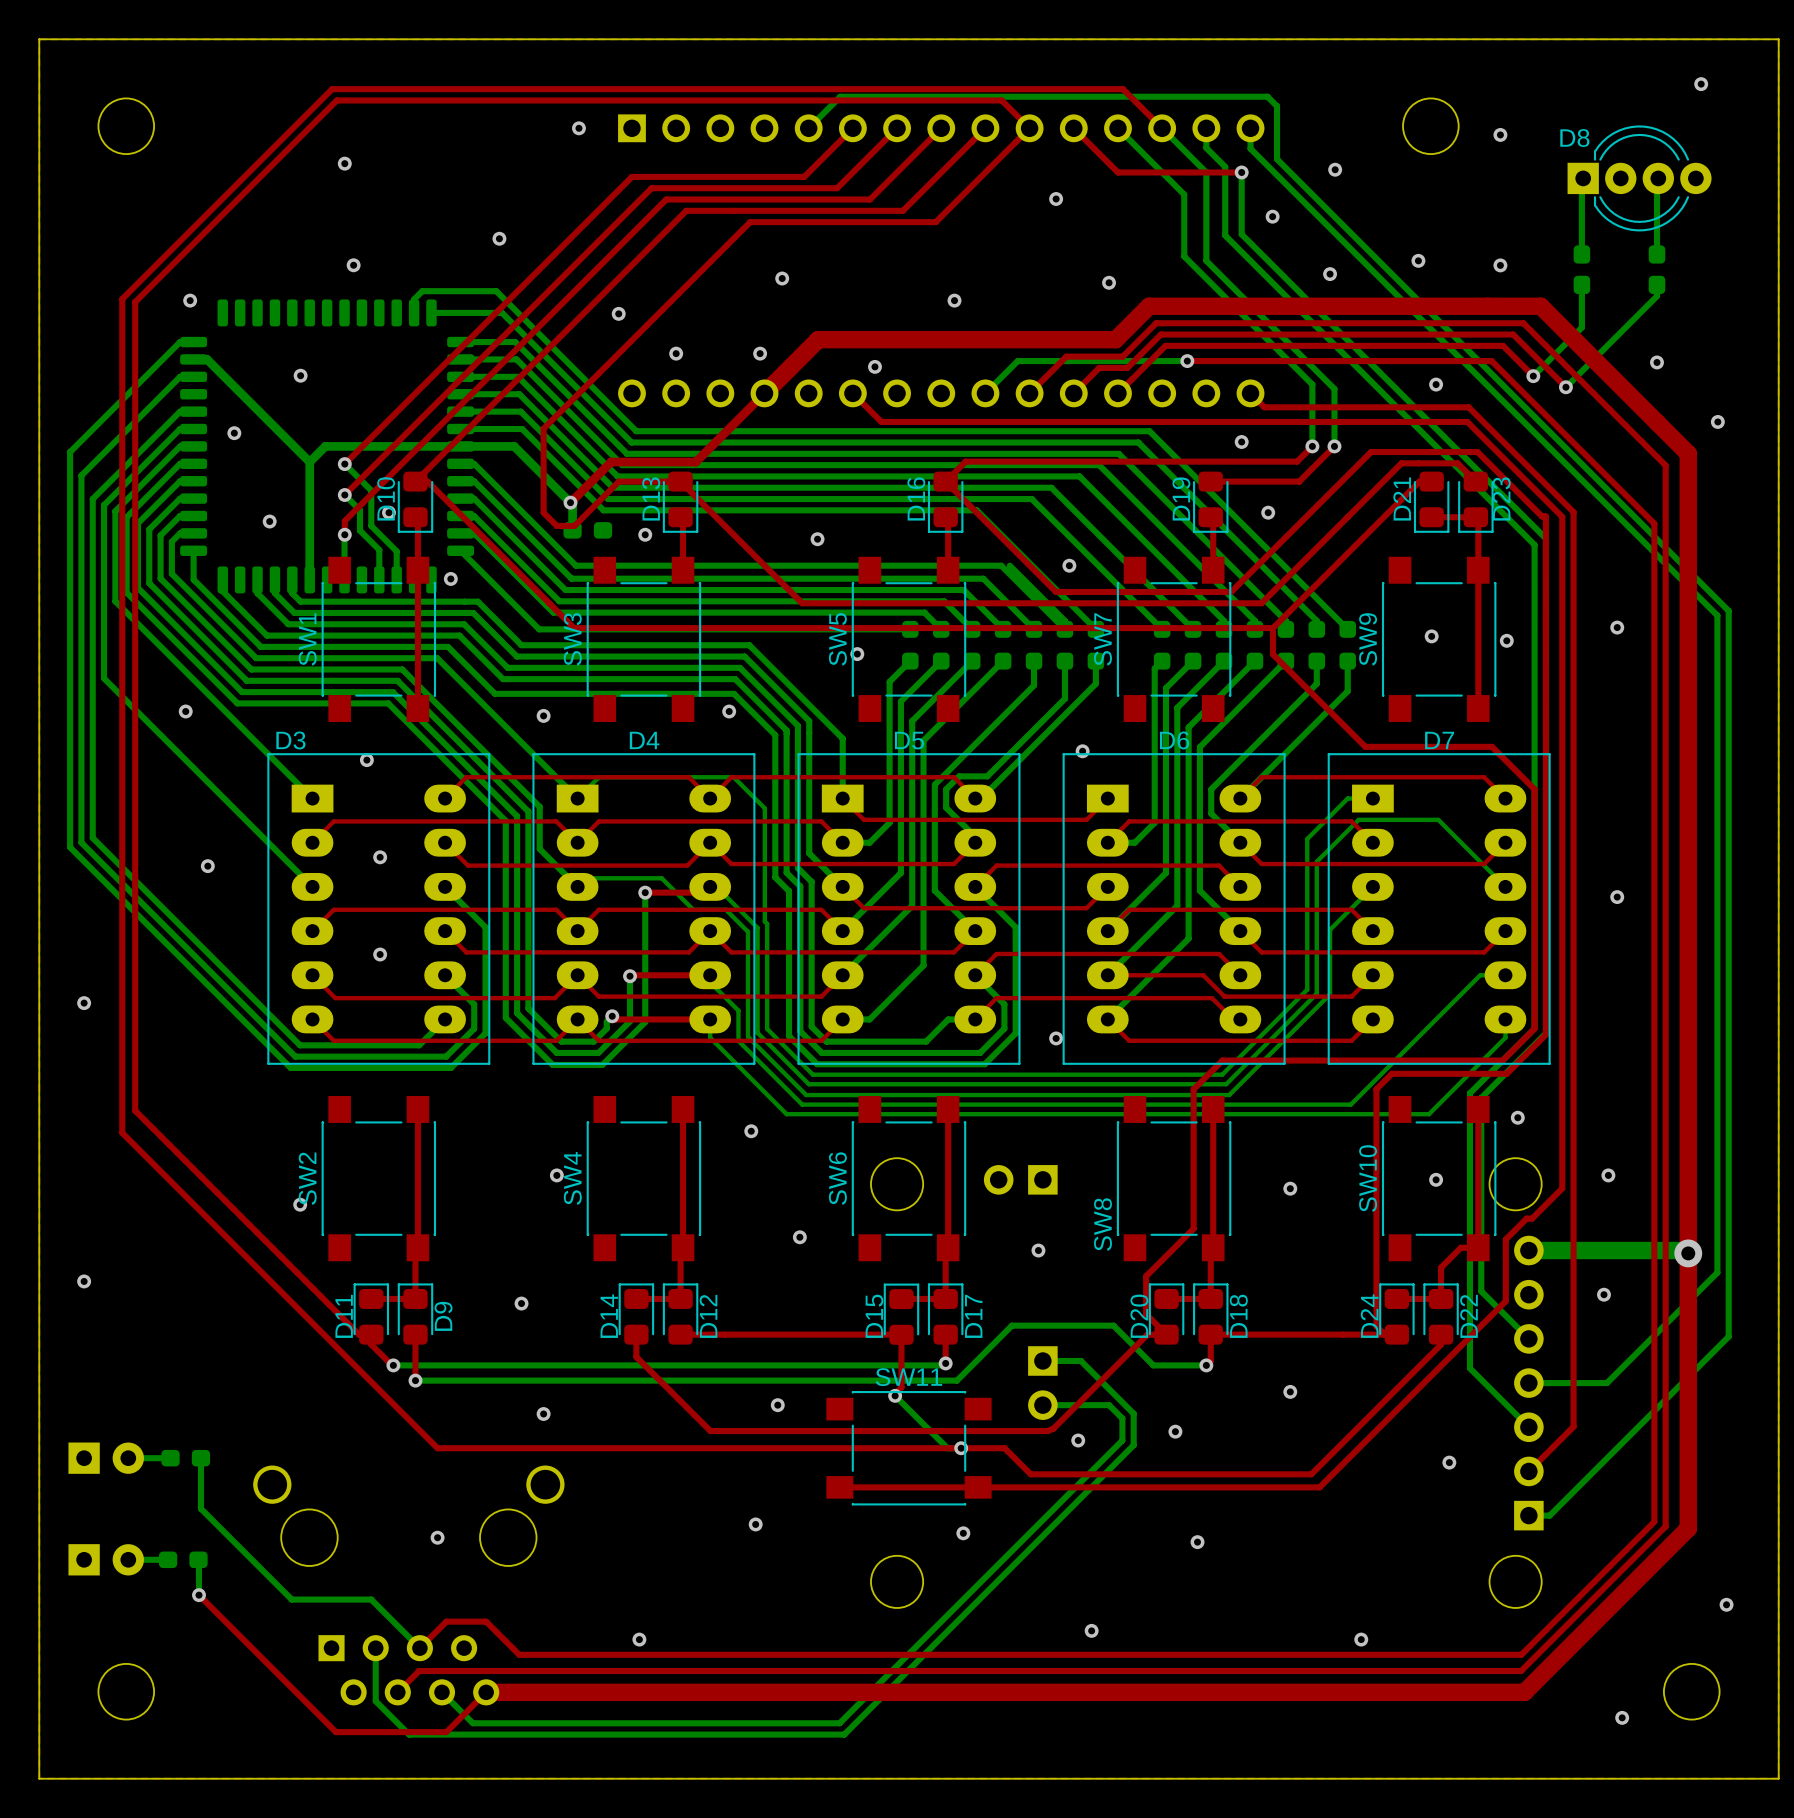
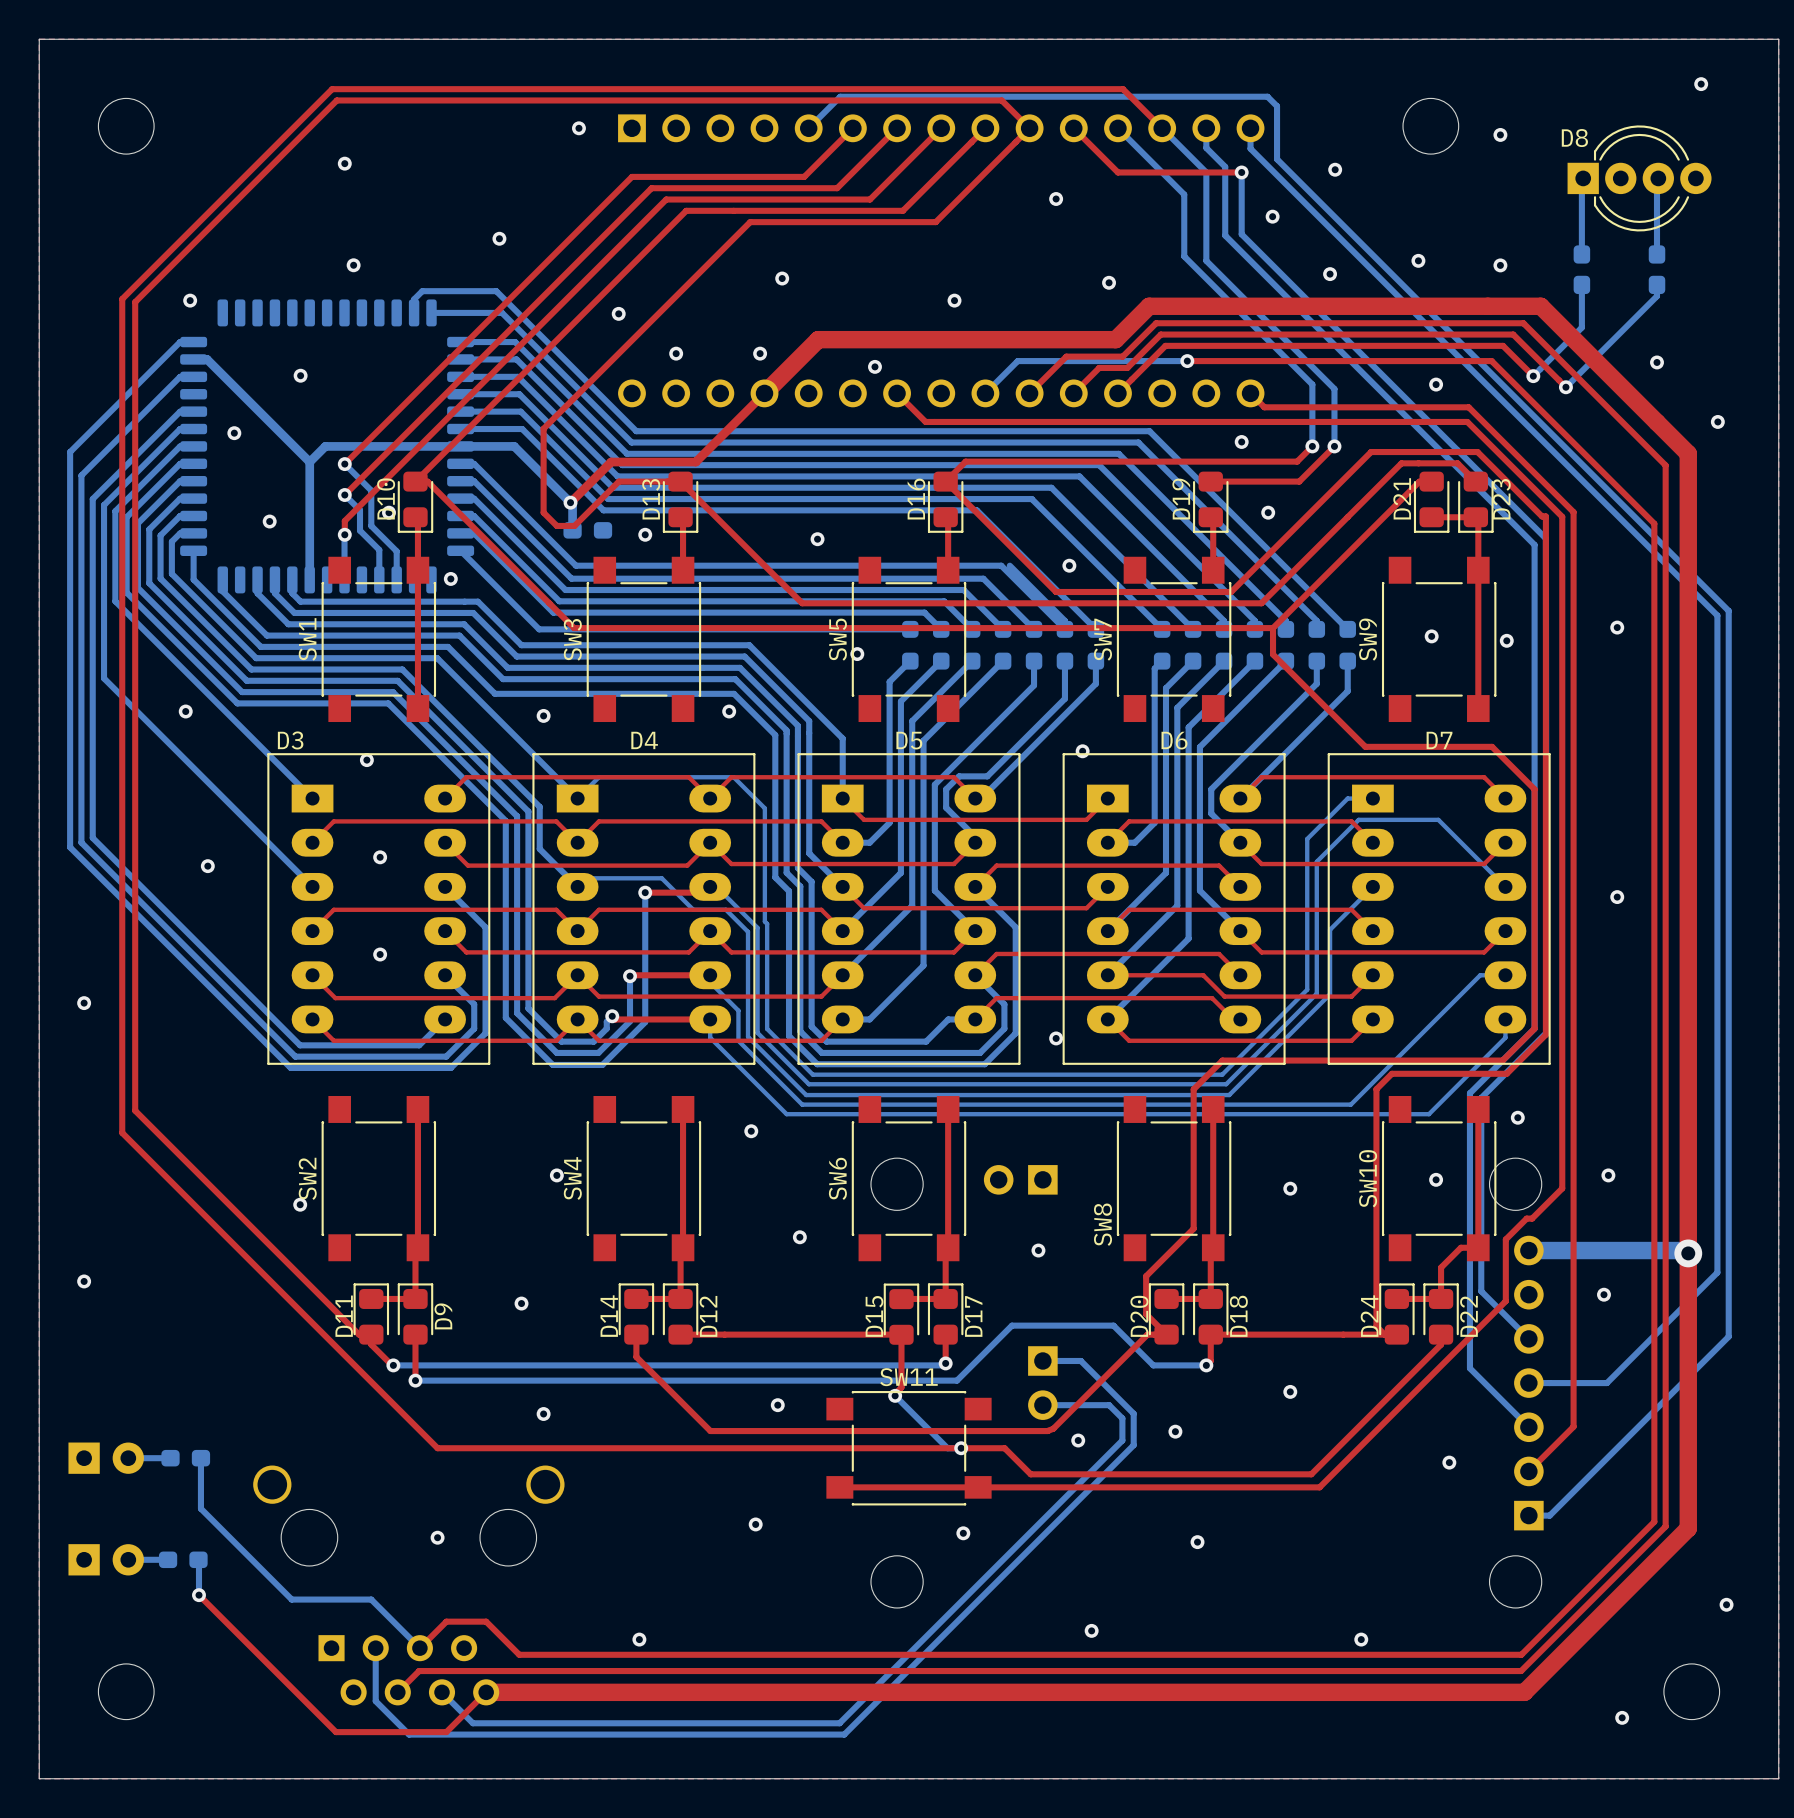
top track: (852, 393) (881, 421) (925, 421) -> (897, 393) (925, 421)

